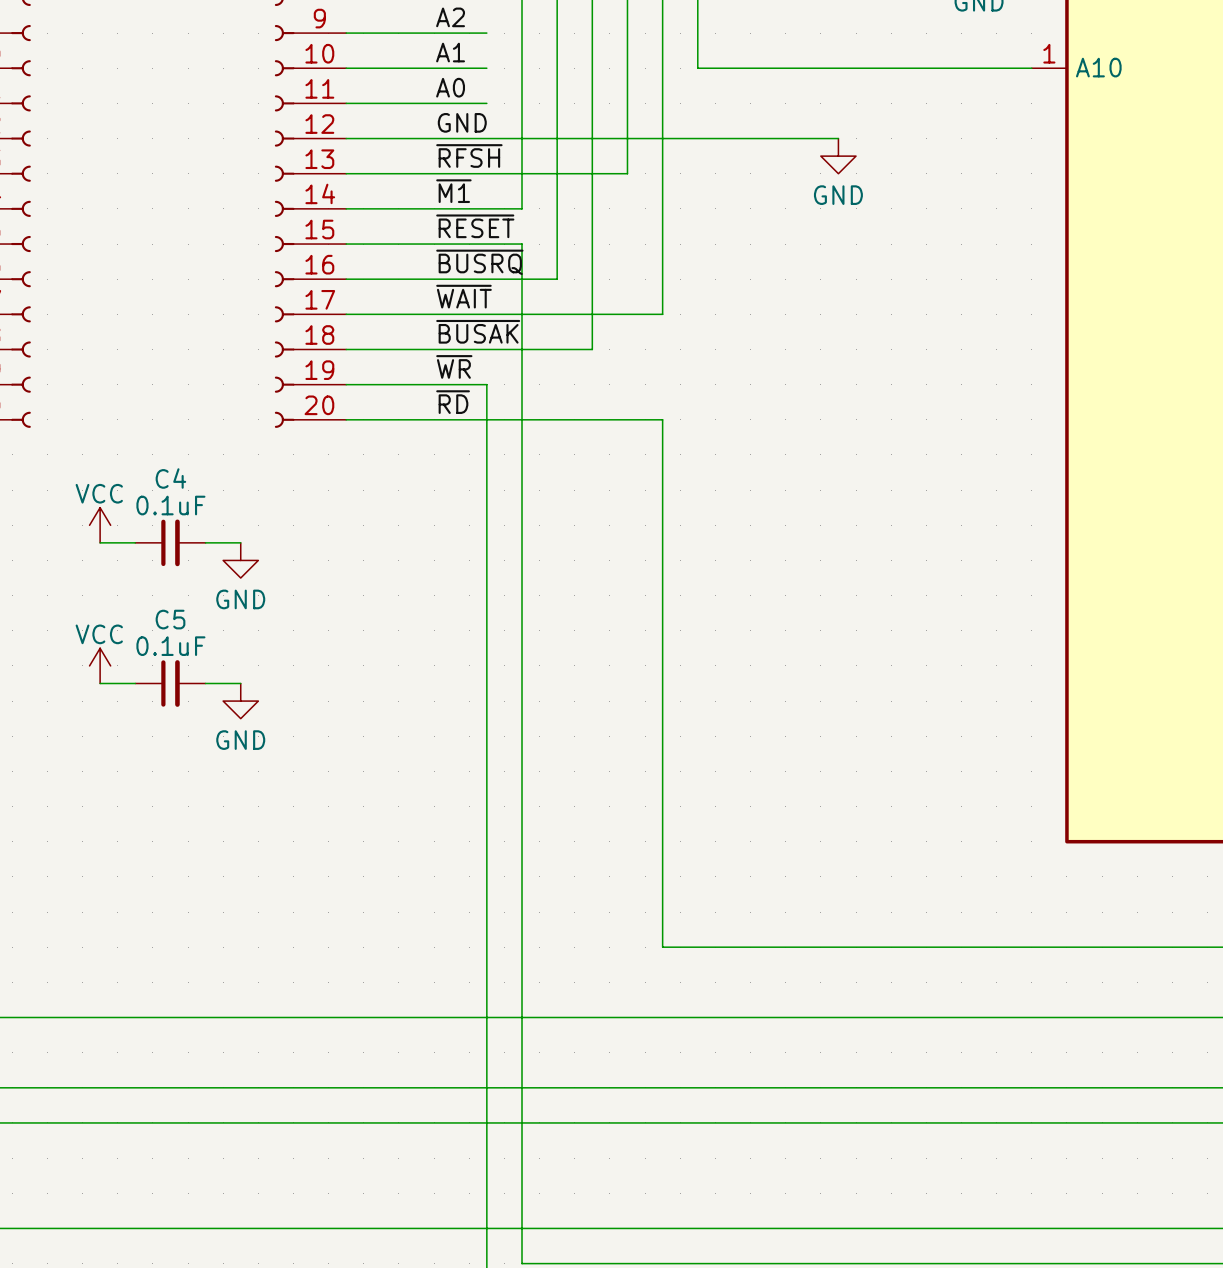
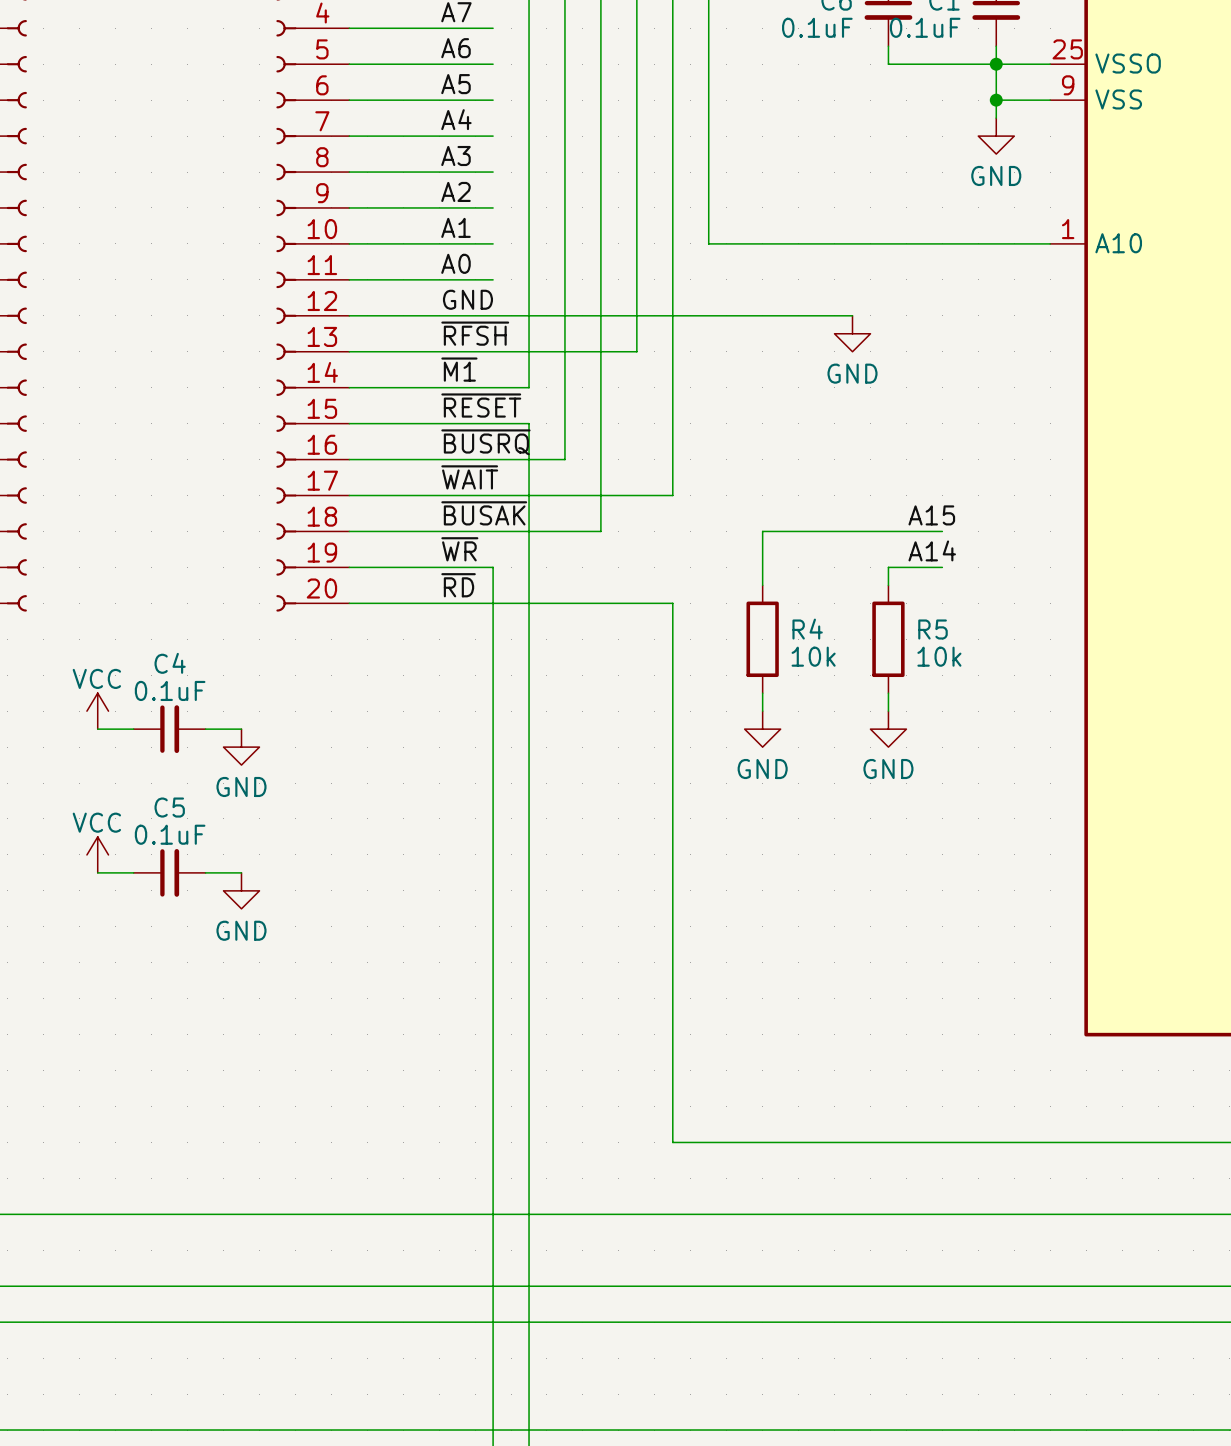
label: none -> A15 (931, 515)
wire: none -> (942, 531) (762, 531) (762, 585)
label: none -> A14 (932, 550)
wire: none -> (942, 567) (888, 567) (888, 585)
R4: none -> 10k (762, 639)
R5: none -> 10k (888, 639)
wire: none -> (762, 693) (762, 711)
wire: none -> (888, 693) (888, 711)
power symbol: none -> GND (762, 729)
power symbol: none -> GND (888, 729)

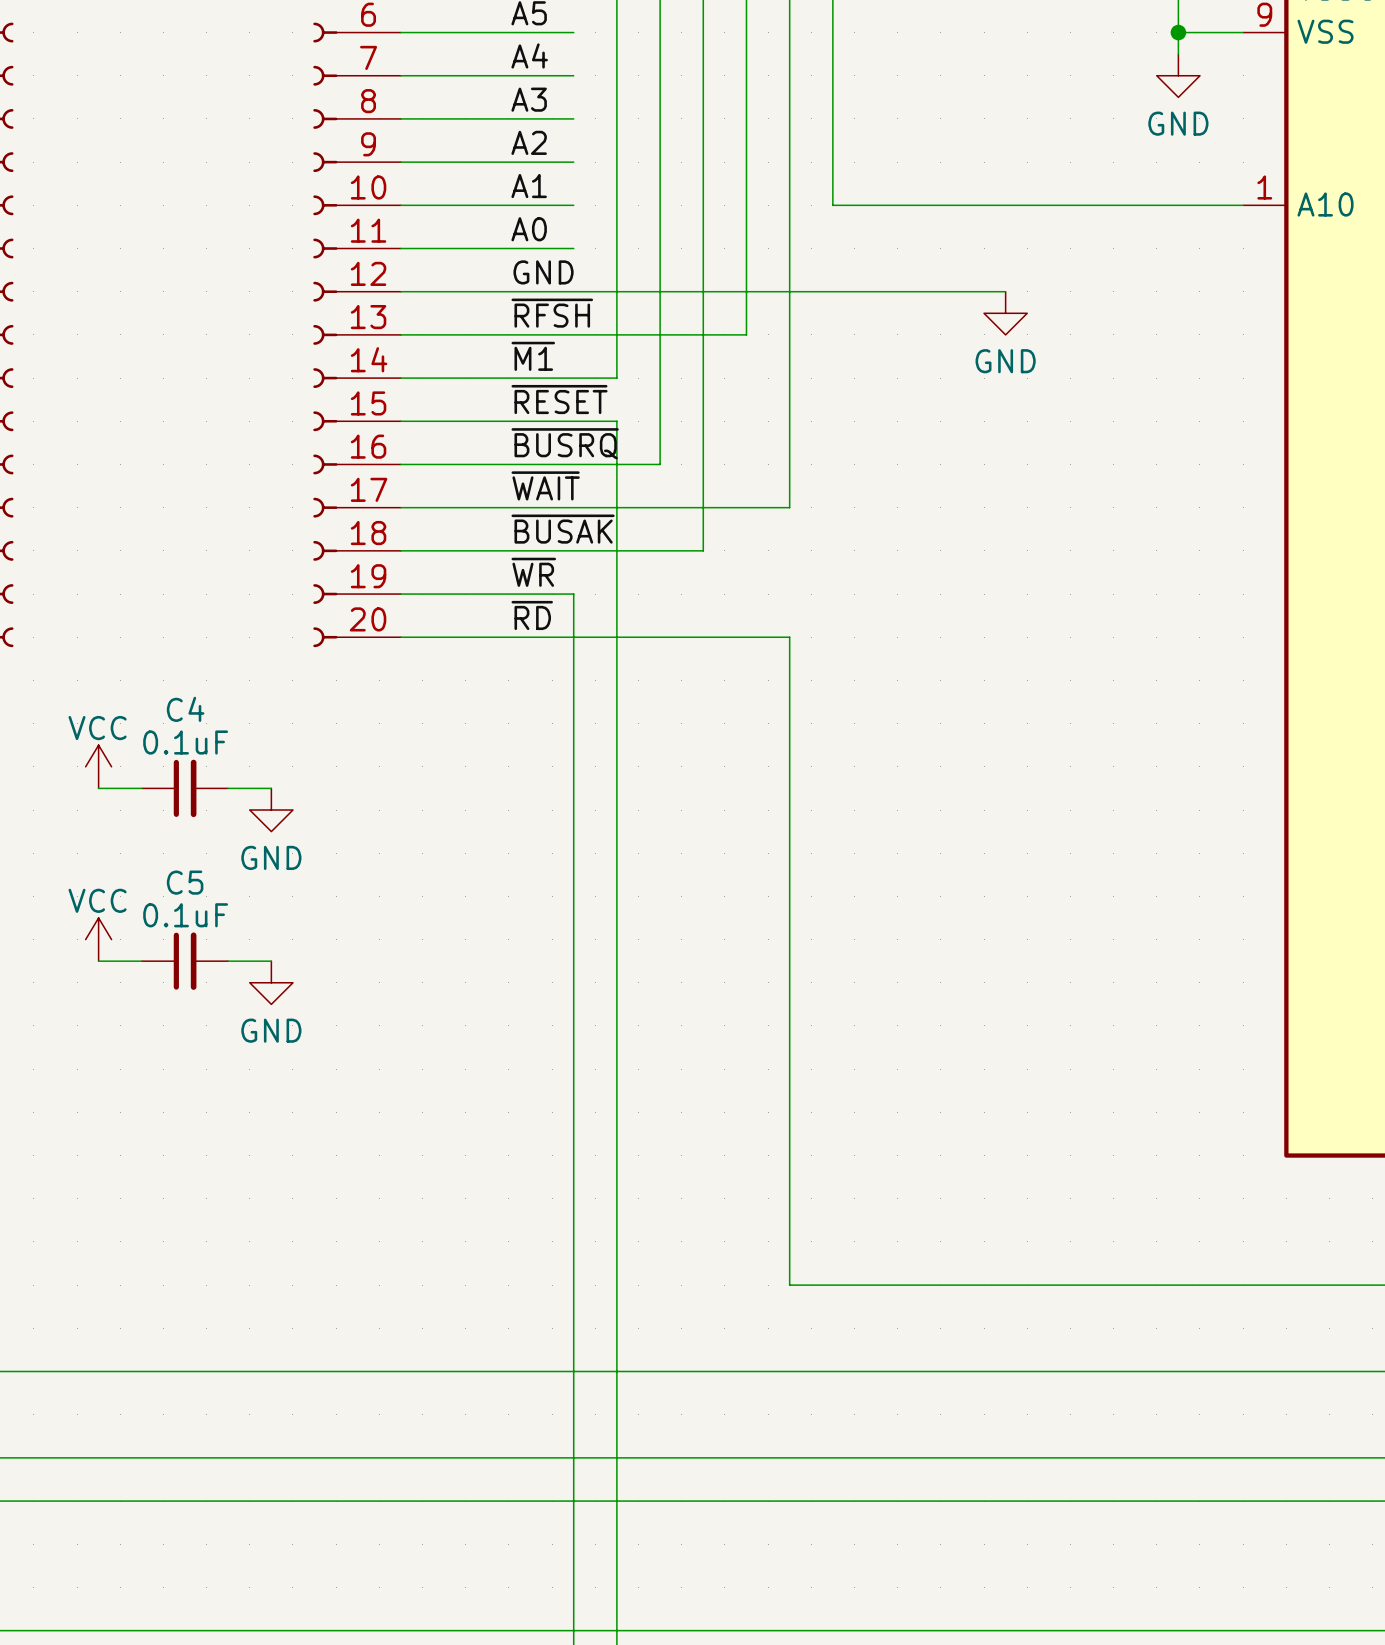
label: A15 (931, 515) -> none
wire: (942, 531) (762, 531) (762, 585) -> none
label: A14 (932, 550) -> none
wire: (942, 567) (888, 567) (888, 585) -> none
R4: 10k (762, 639) -> none
R5: 10k (888, 639) -> none
wire: (762, 693) (762, 711) -> none
wire: (888, 693) (888, 711) -> none
power symbol: GND (762, 729) -> none
power symbol: GND (888, 729) -> none

